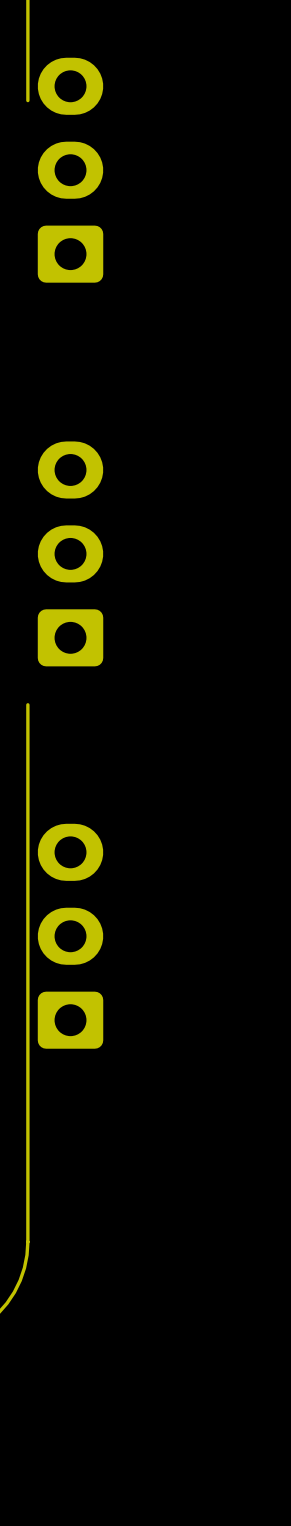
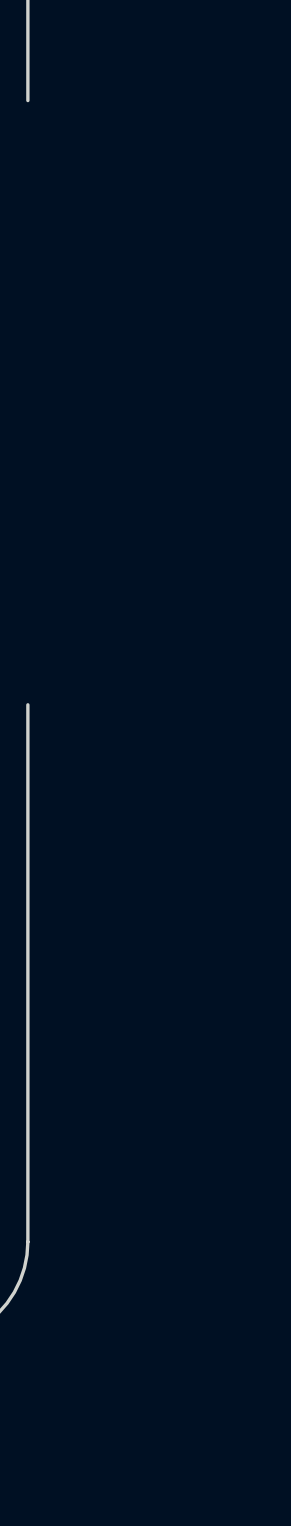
part: (70, 170) -> none
part: (70, 553) -> none
part: (70, 936) -> none

